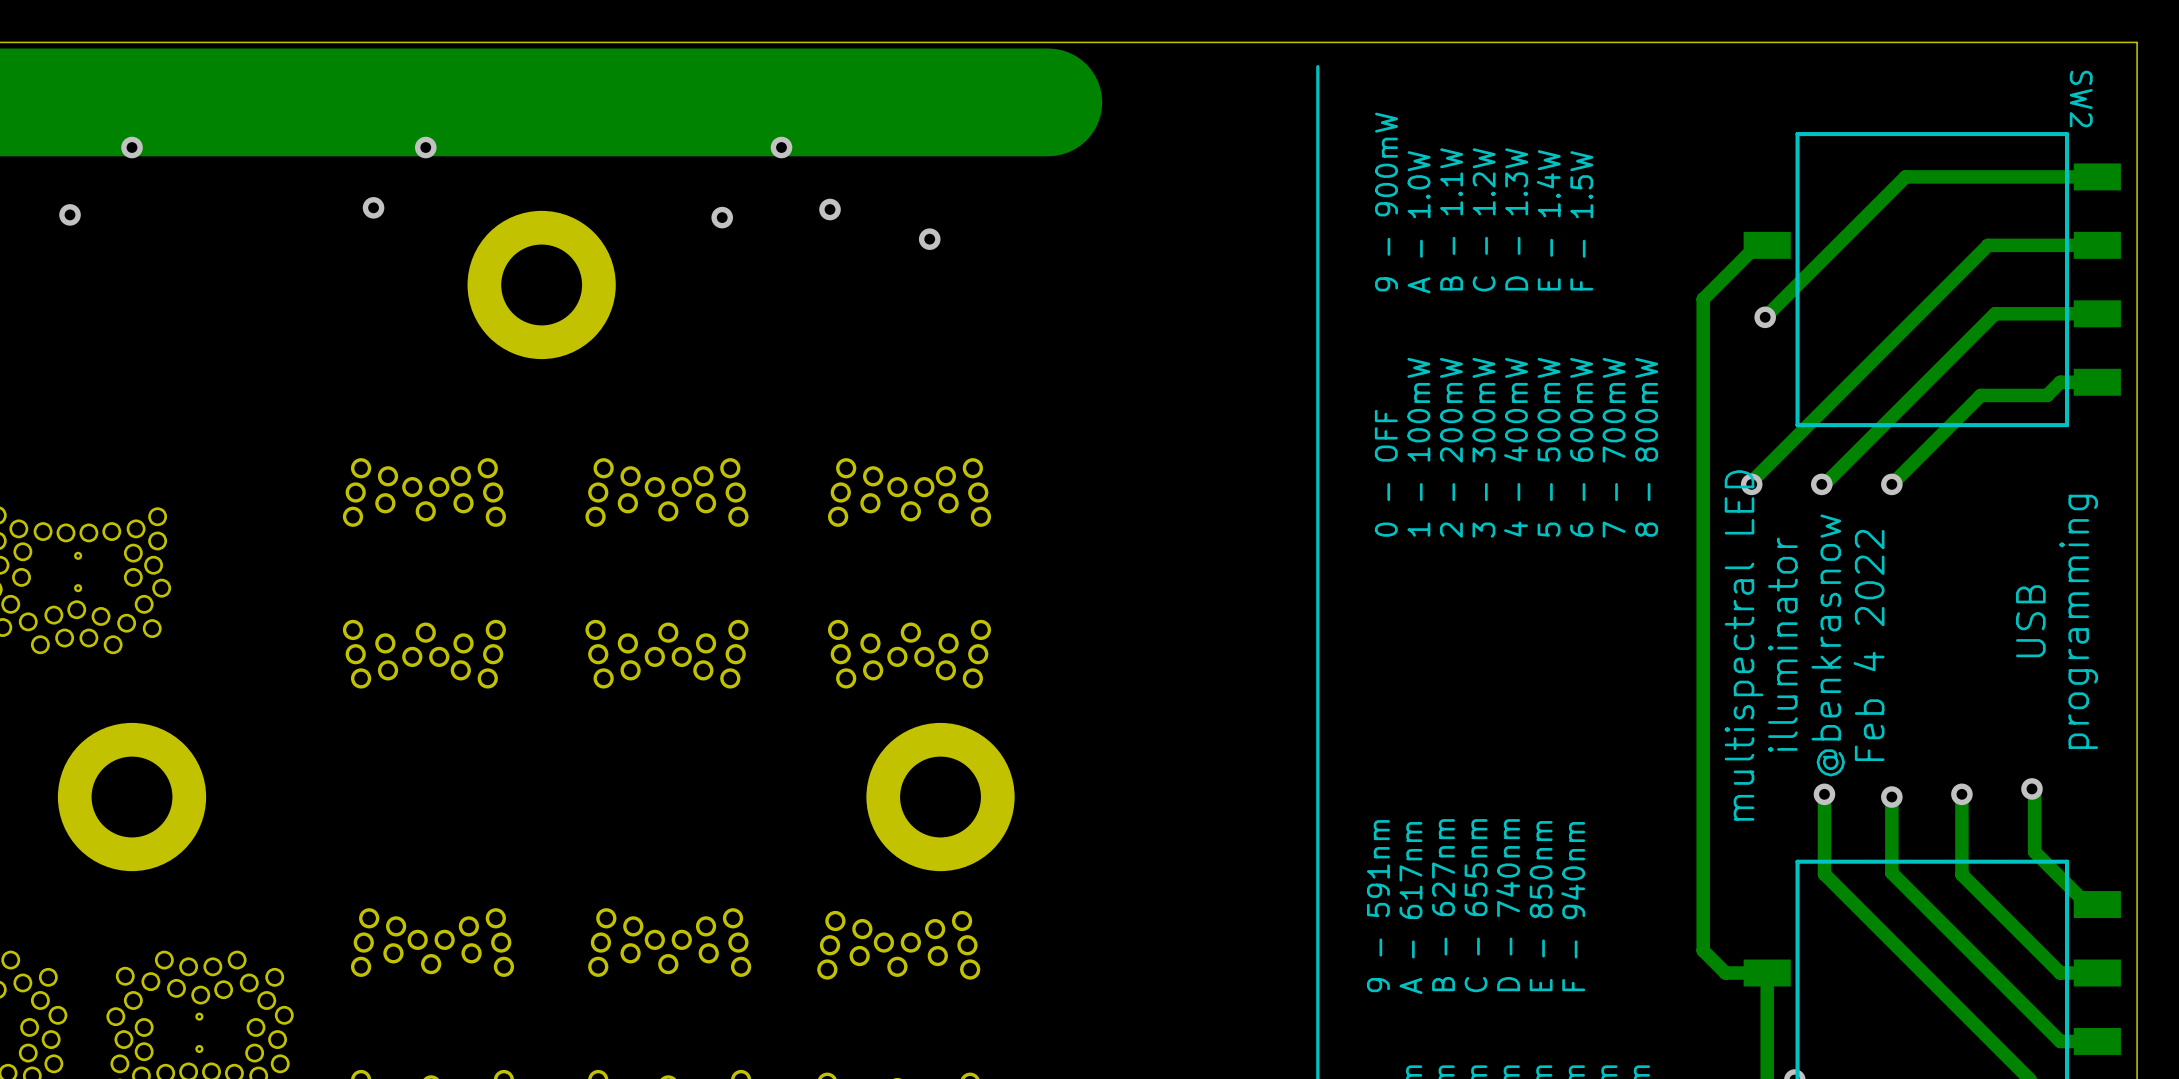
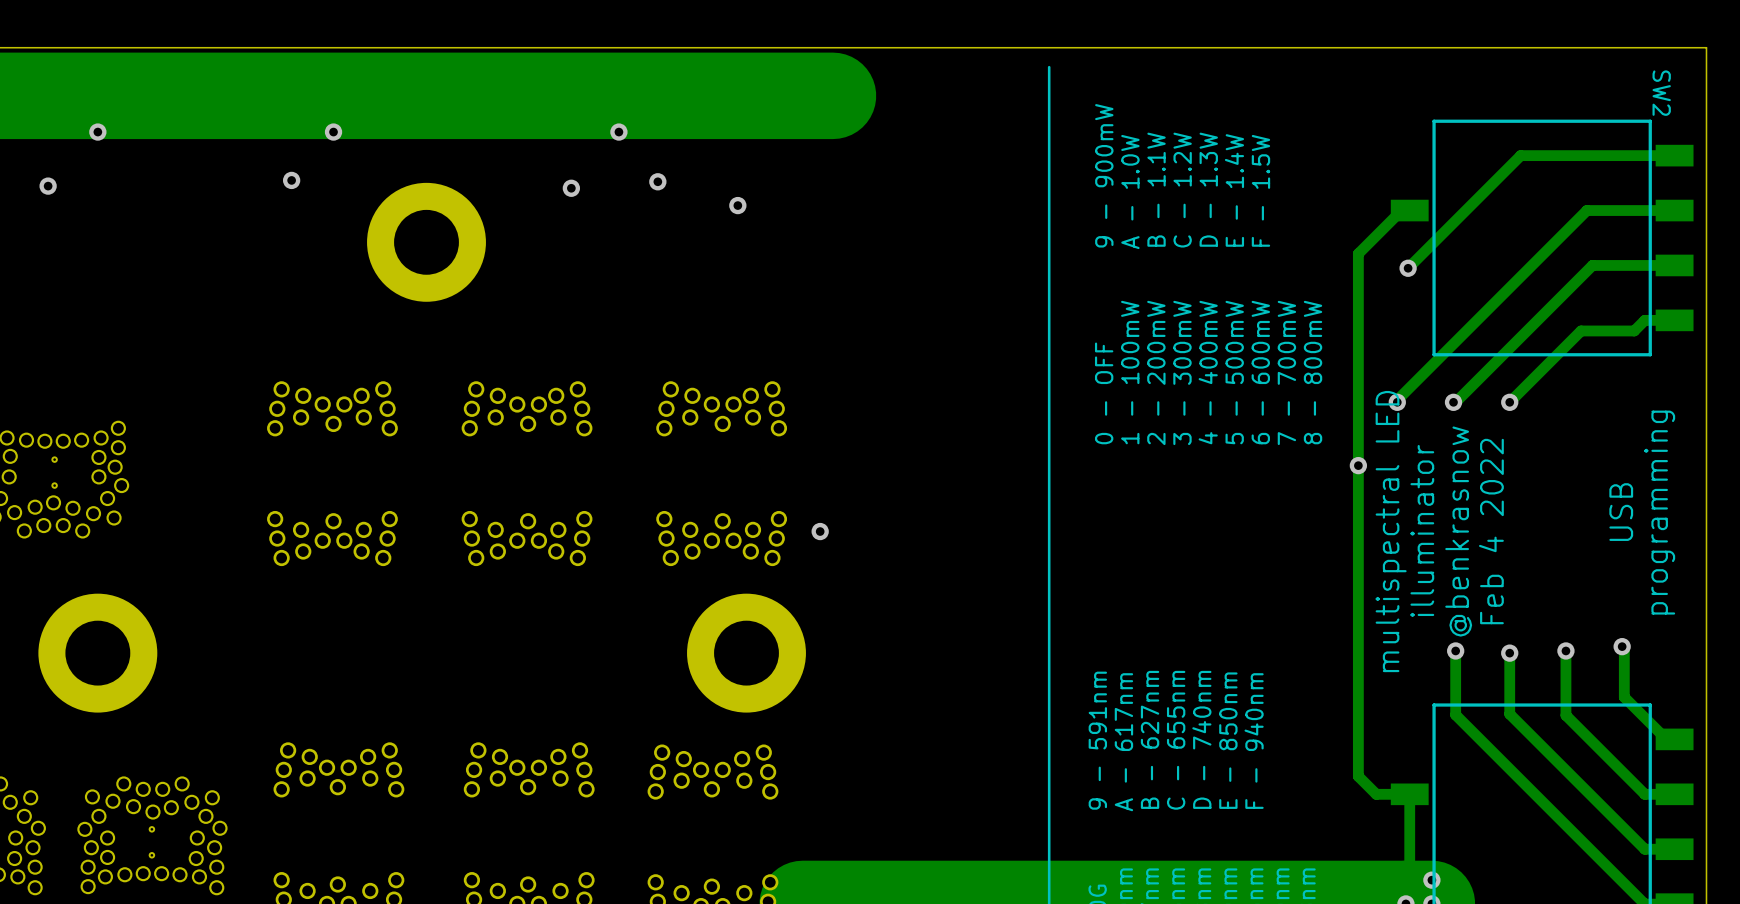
via: none -> (1358, 465)
via: none -> (820, 531)

